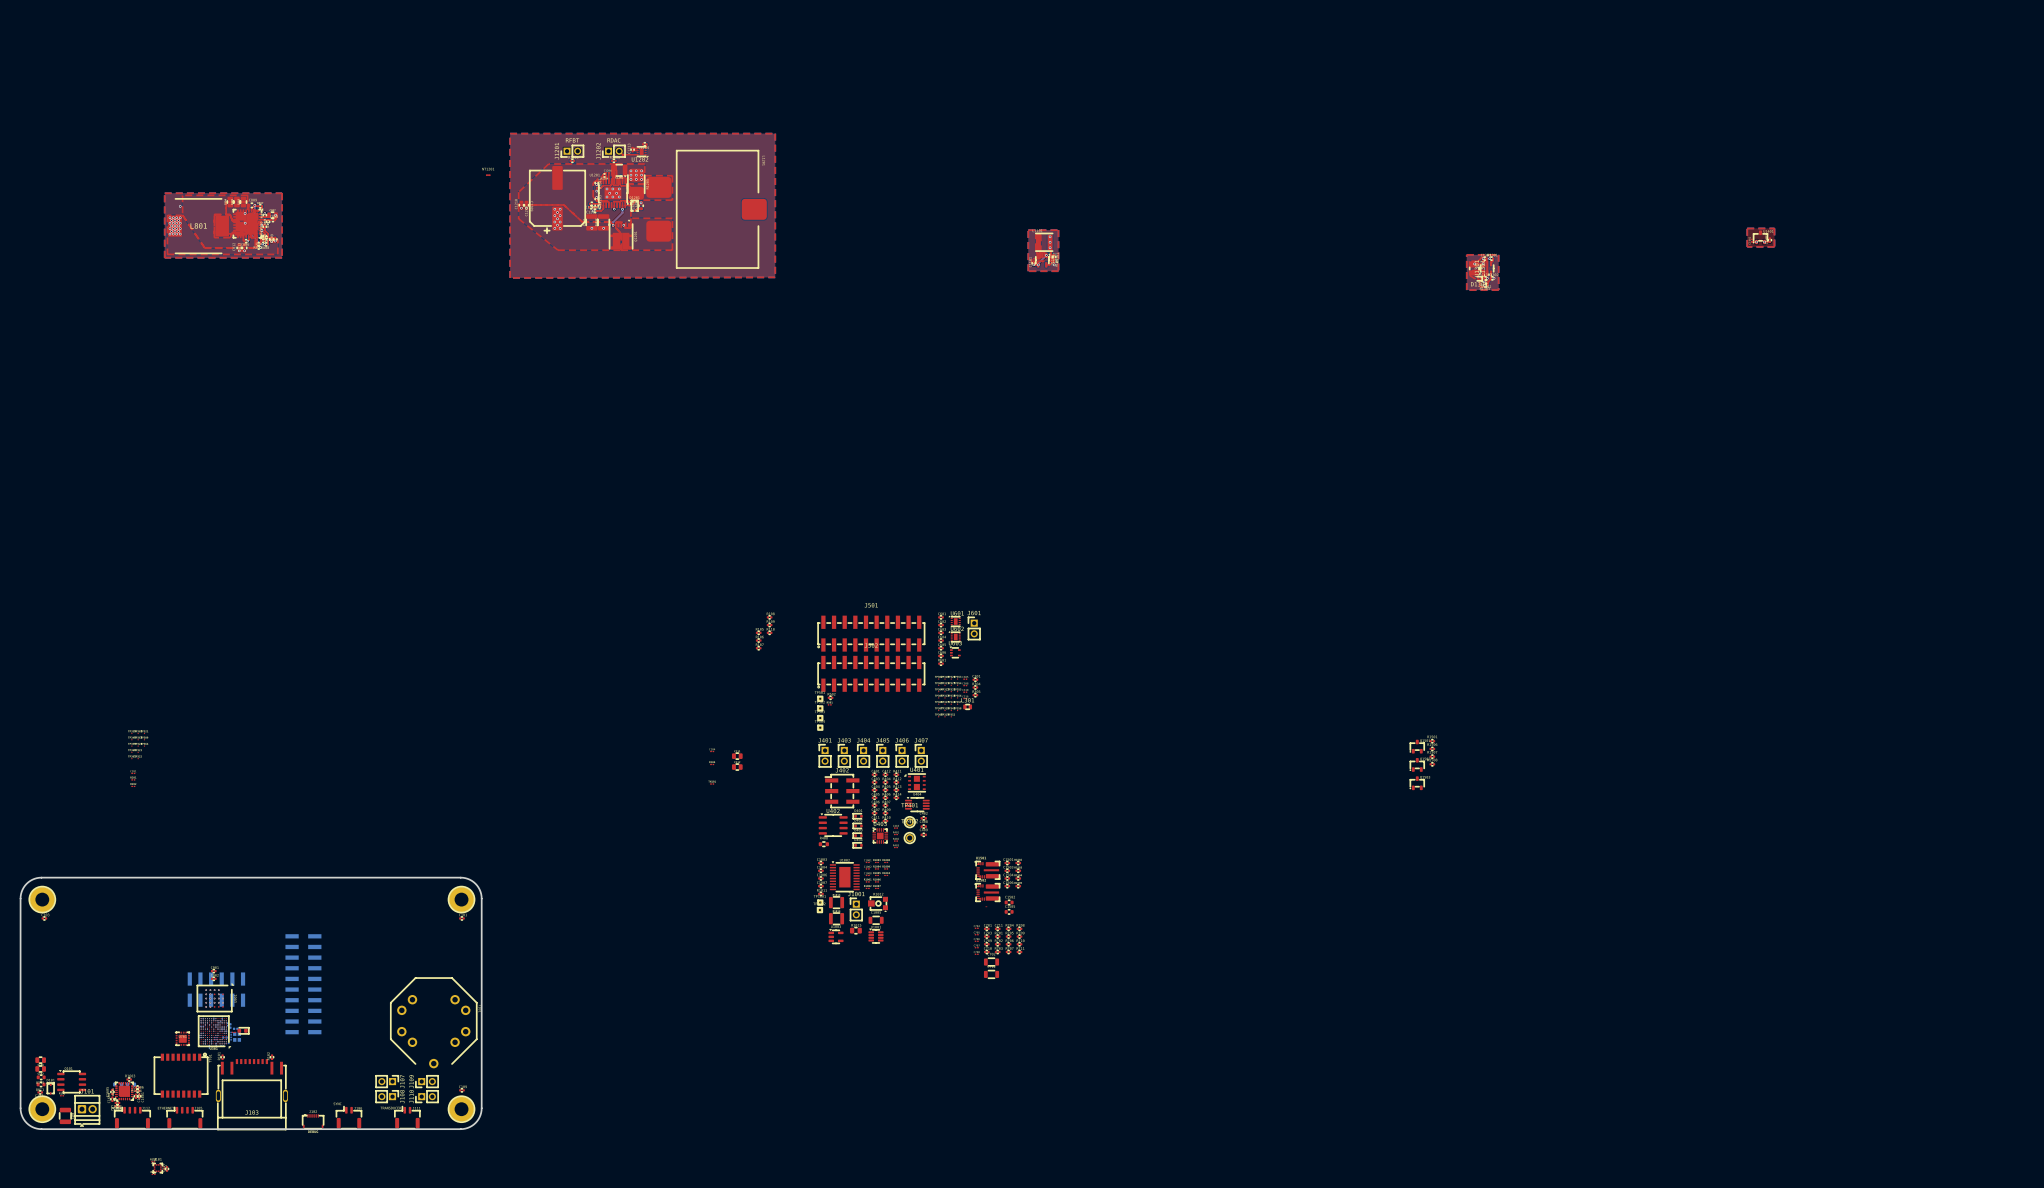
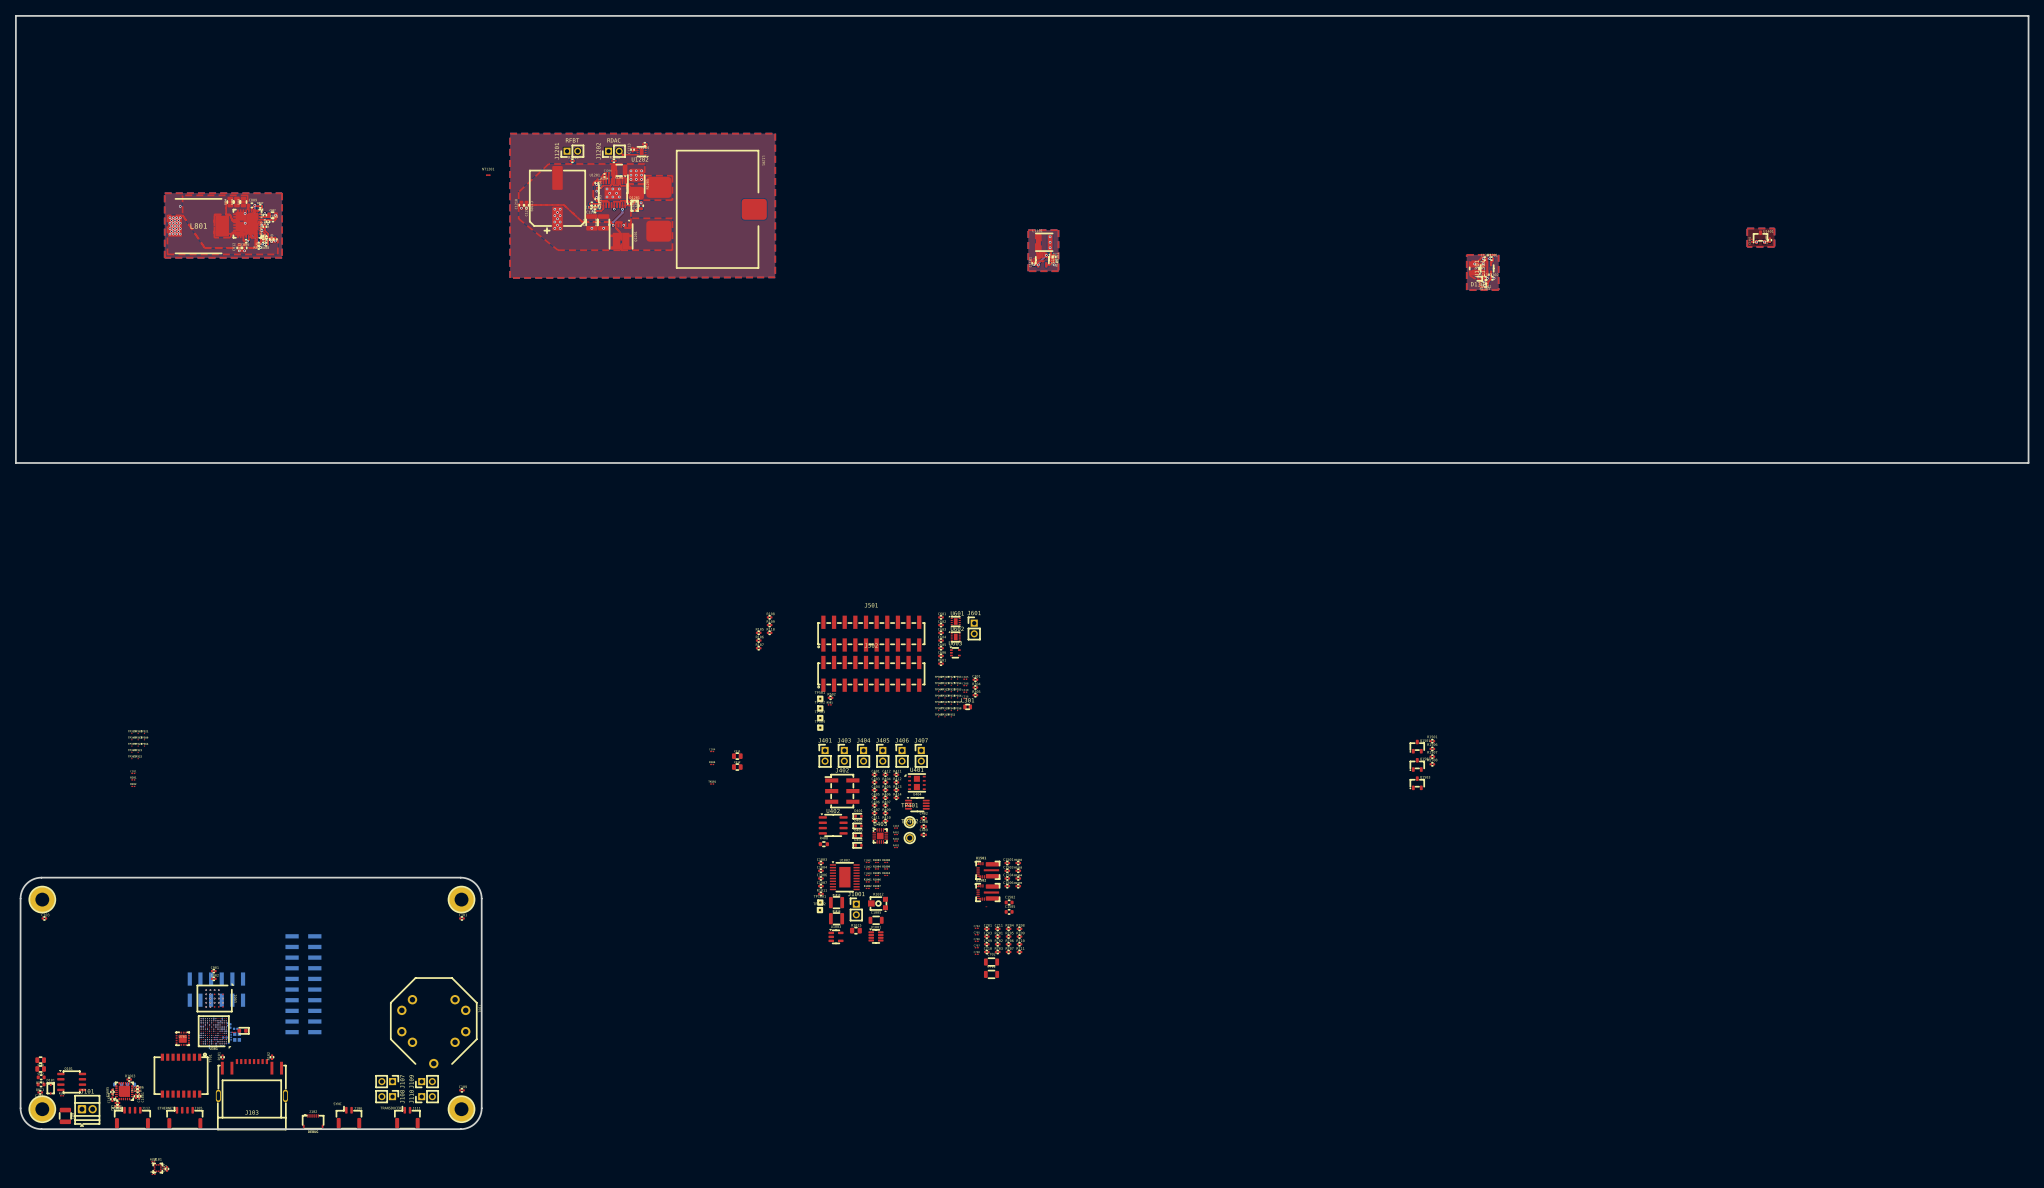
board edge: none -> (15, 15) (2028, 15) (2028, 462) (15, 462) (15, 15)

